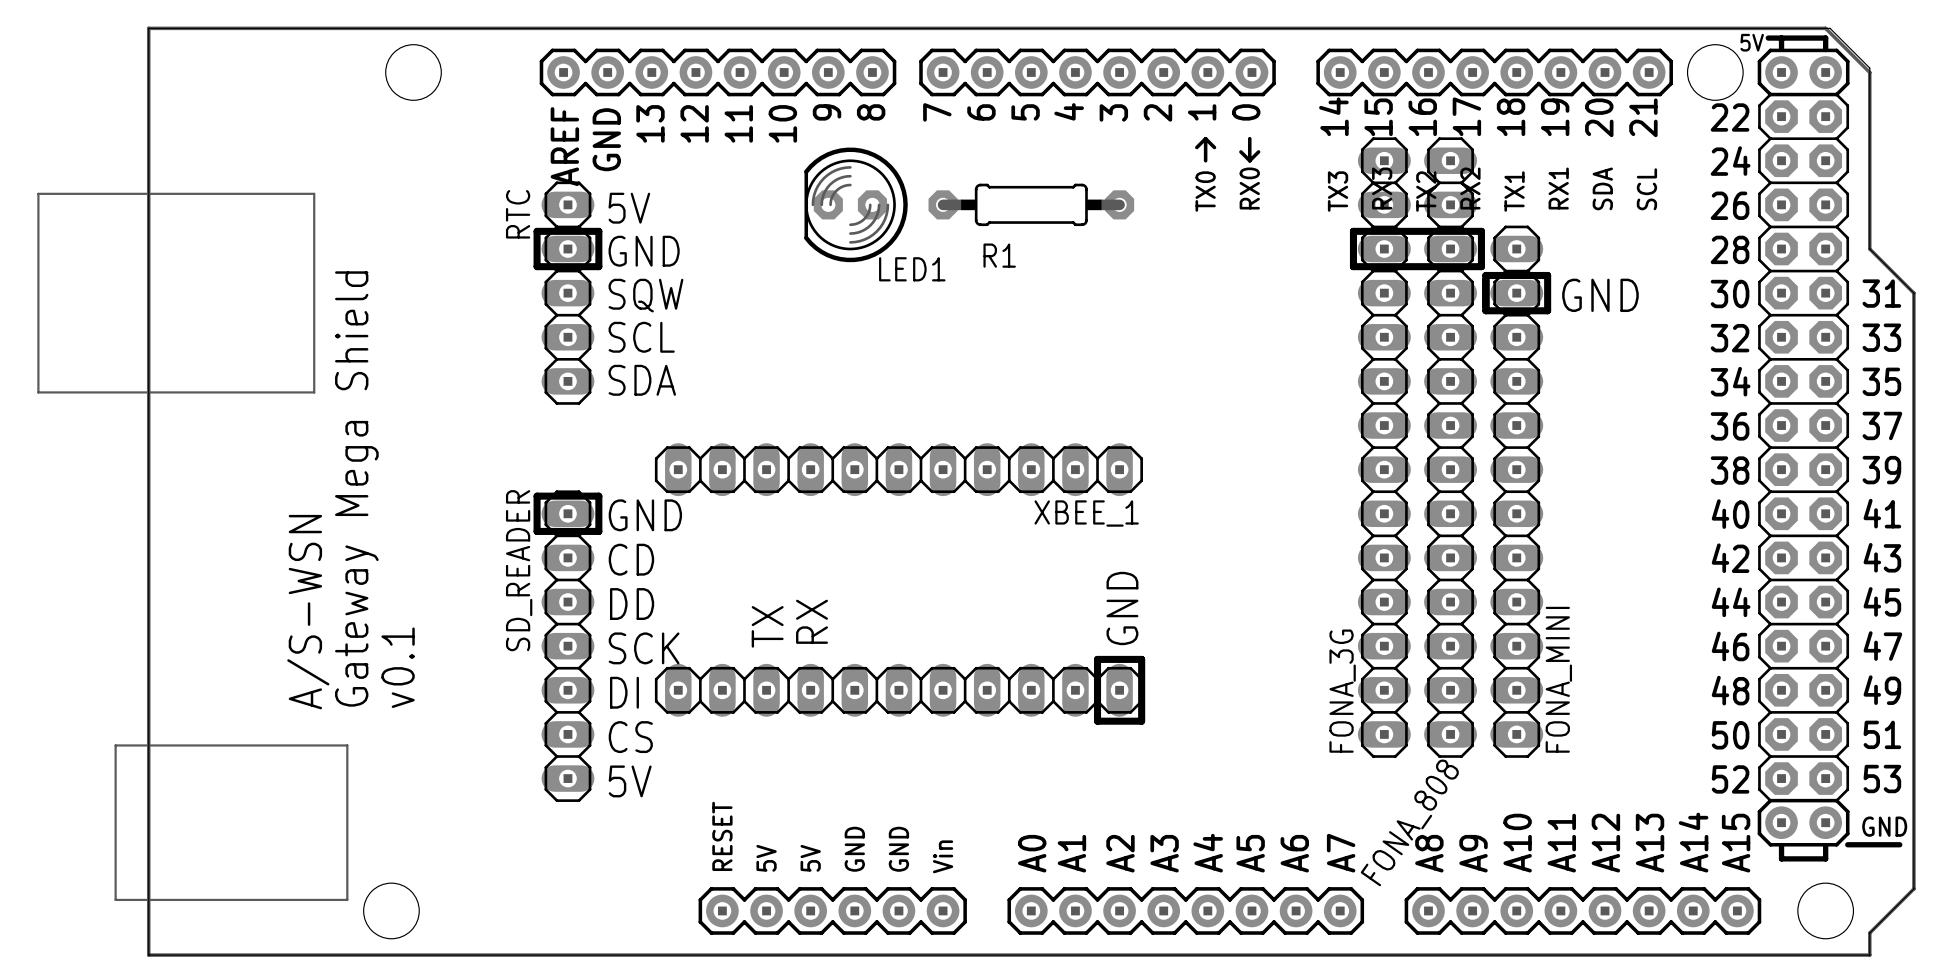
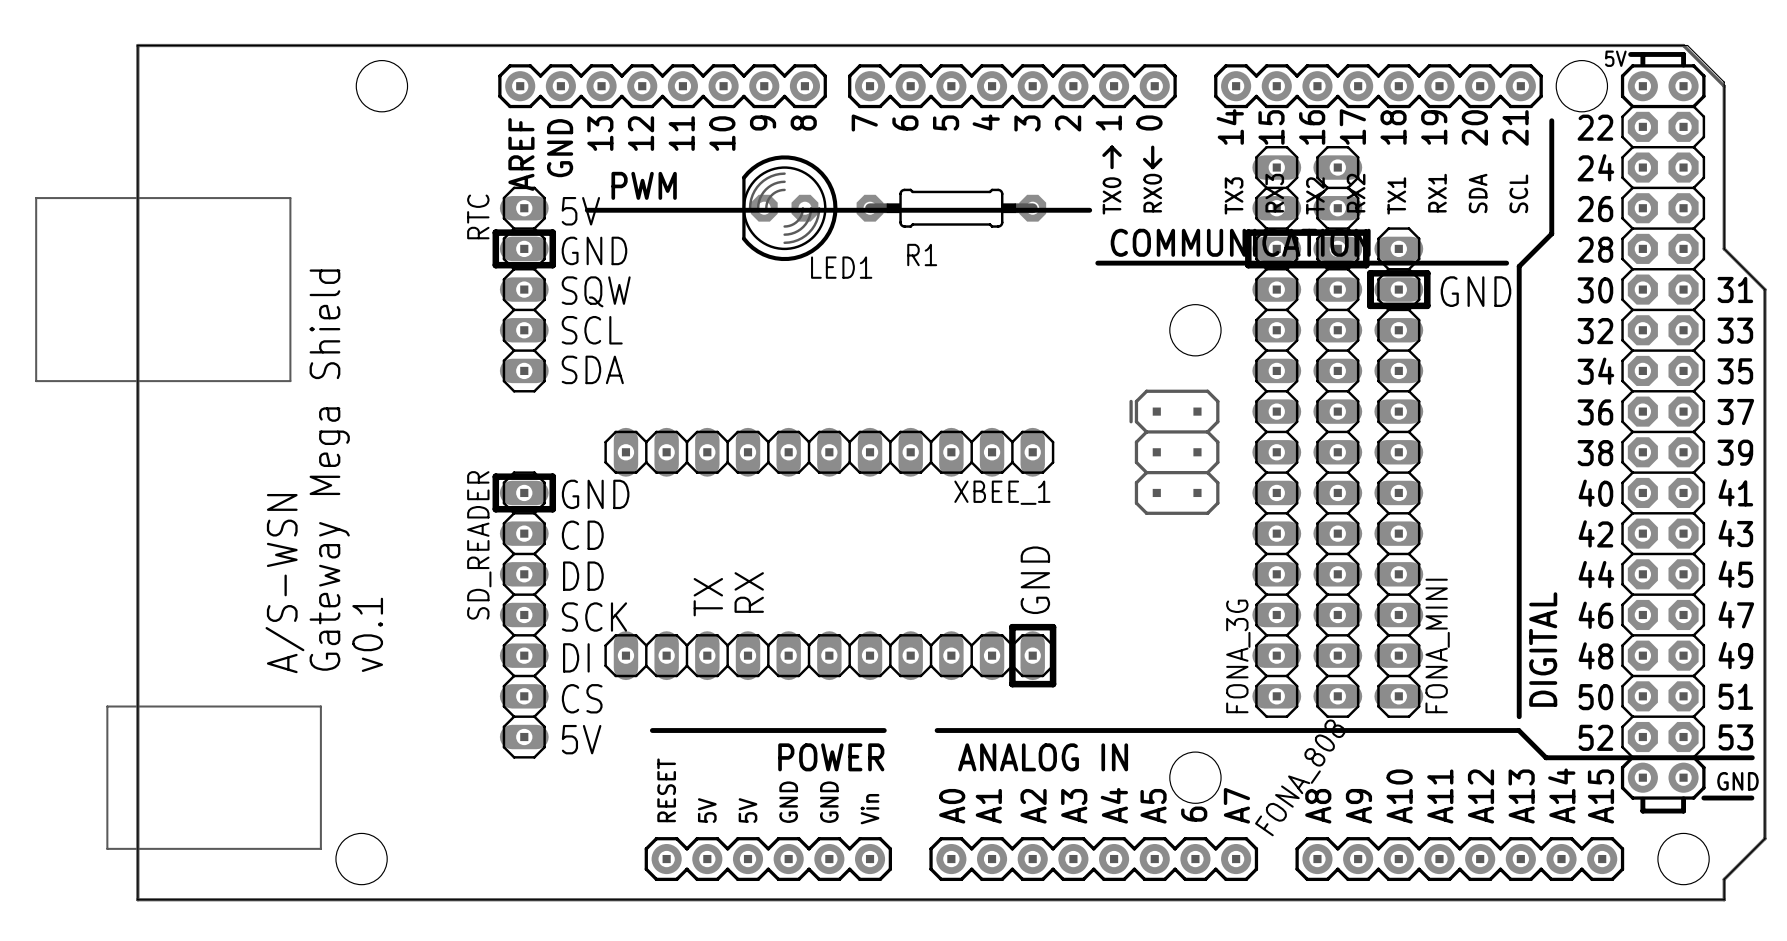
part footprint: [37, 26, 1916, 957] -> [35, 43, 1767, 902]

